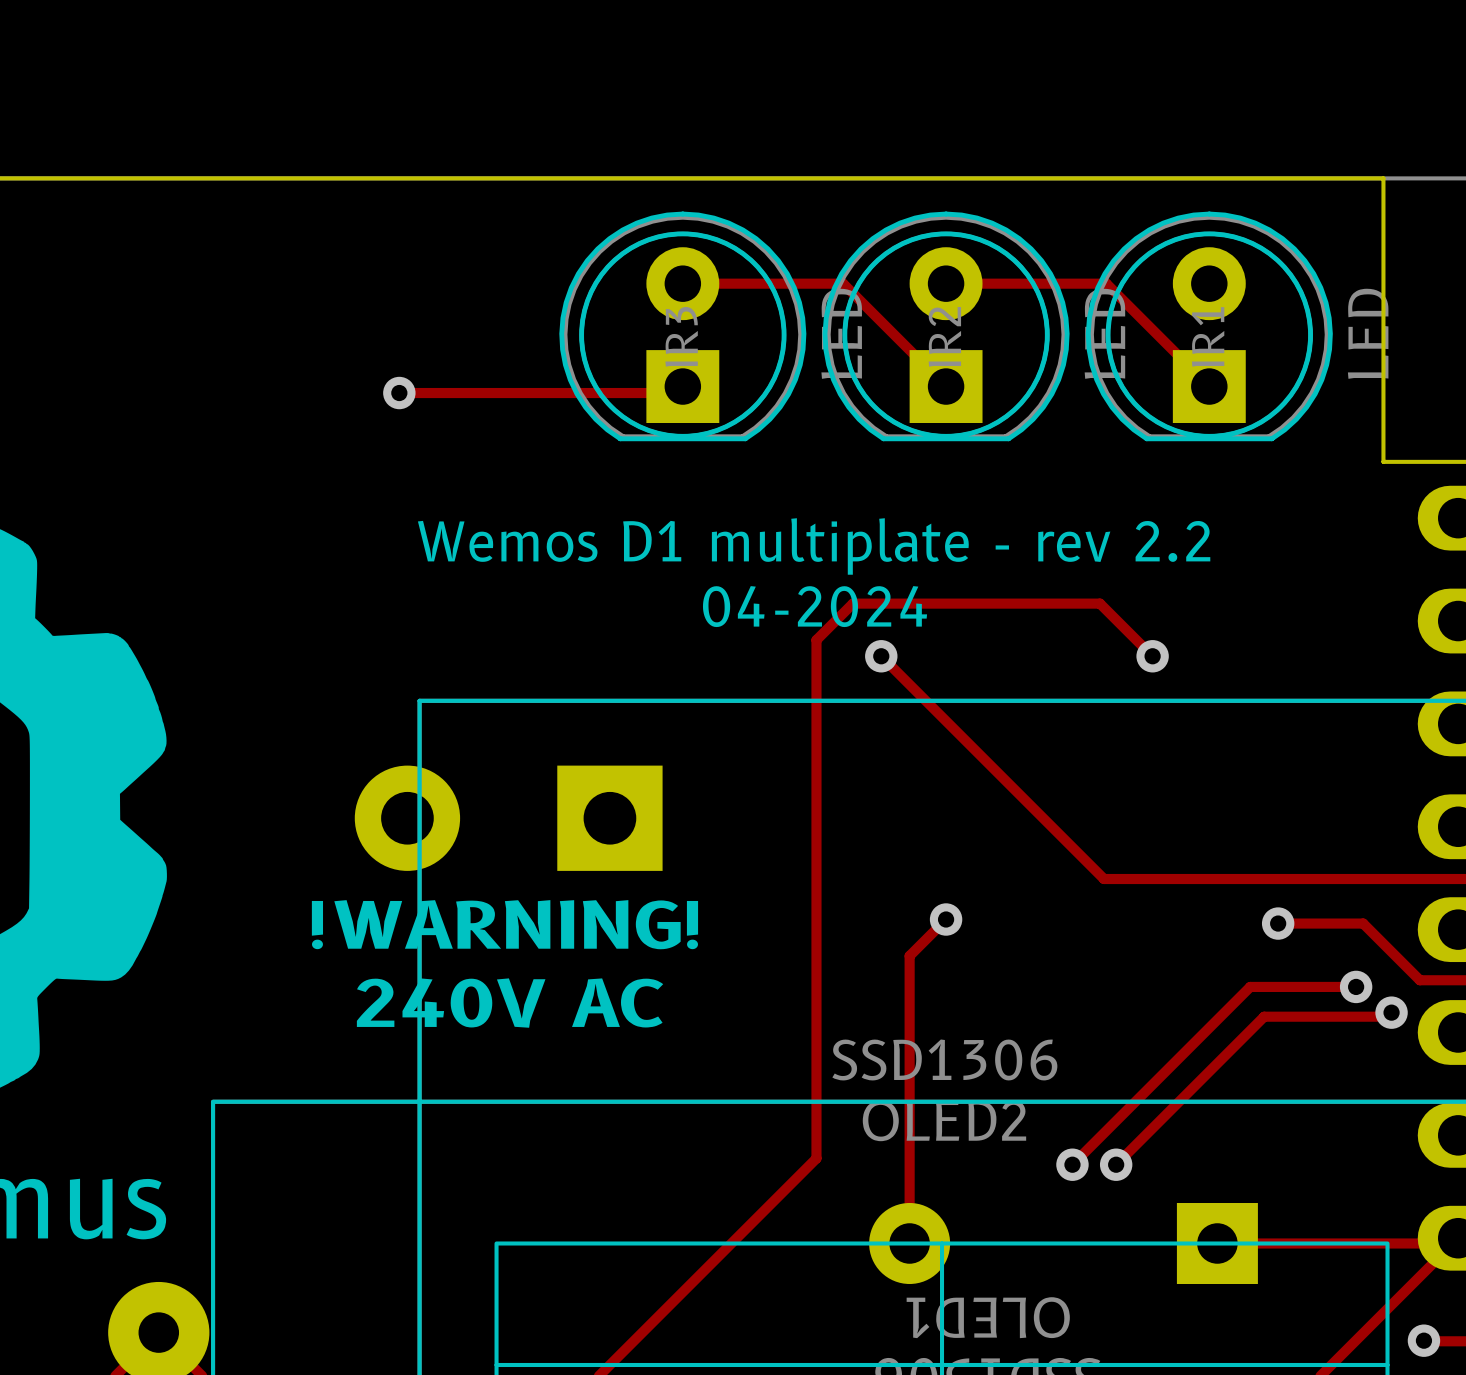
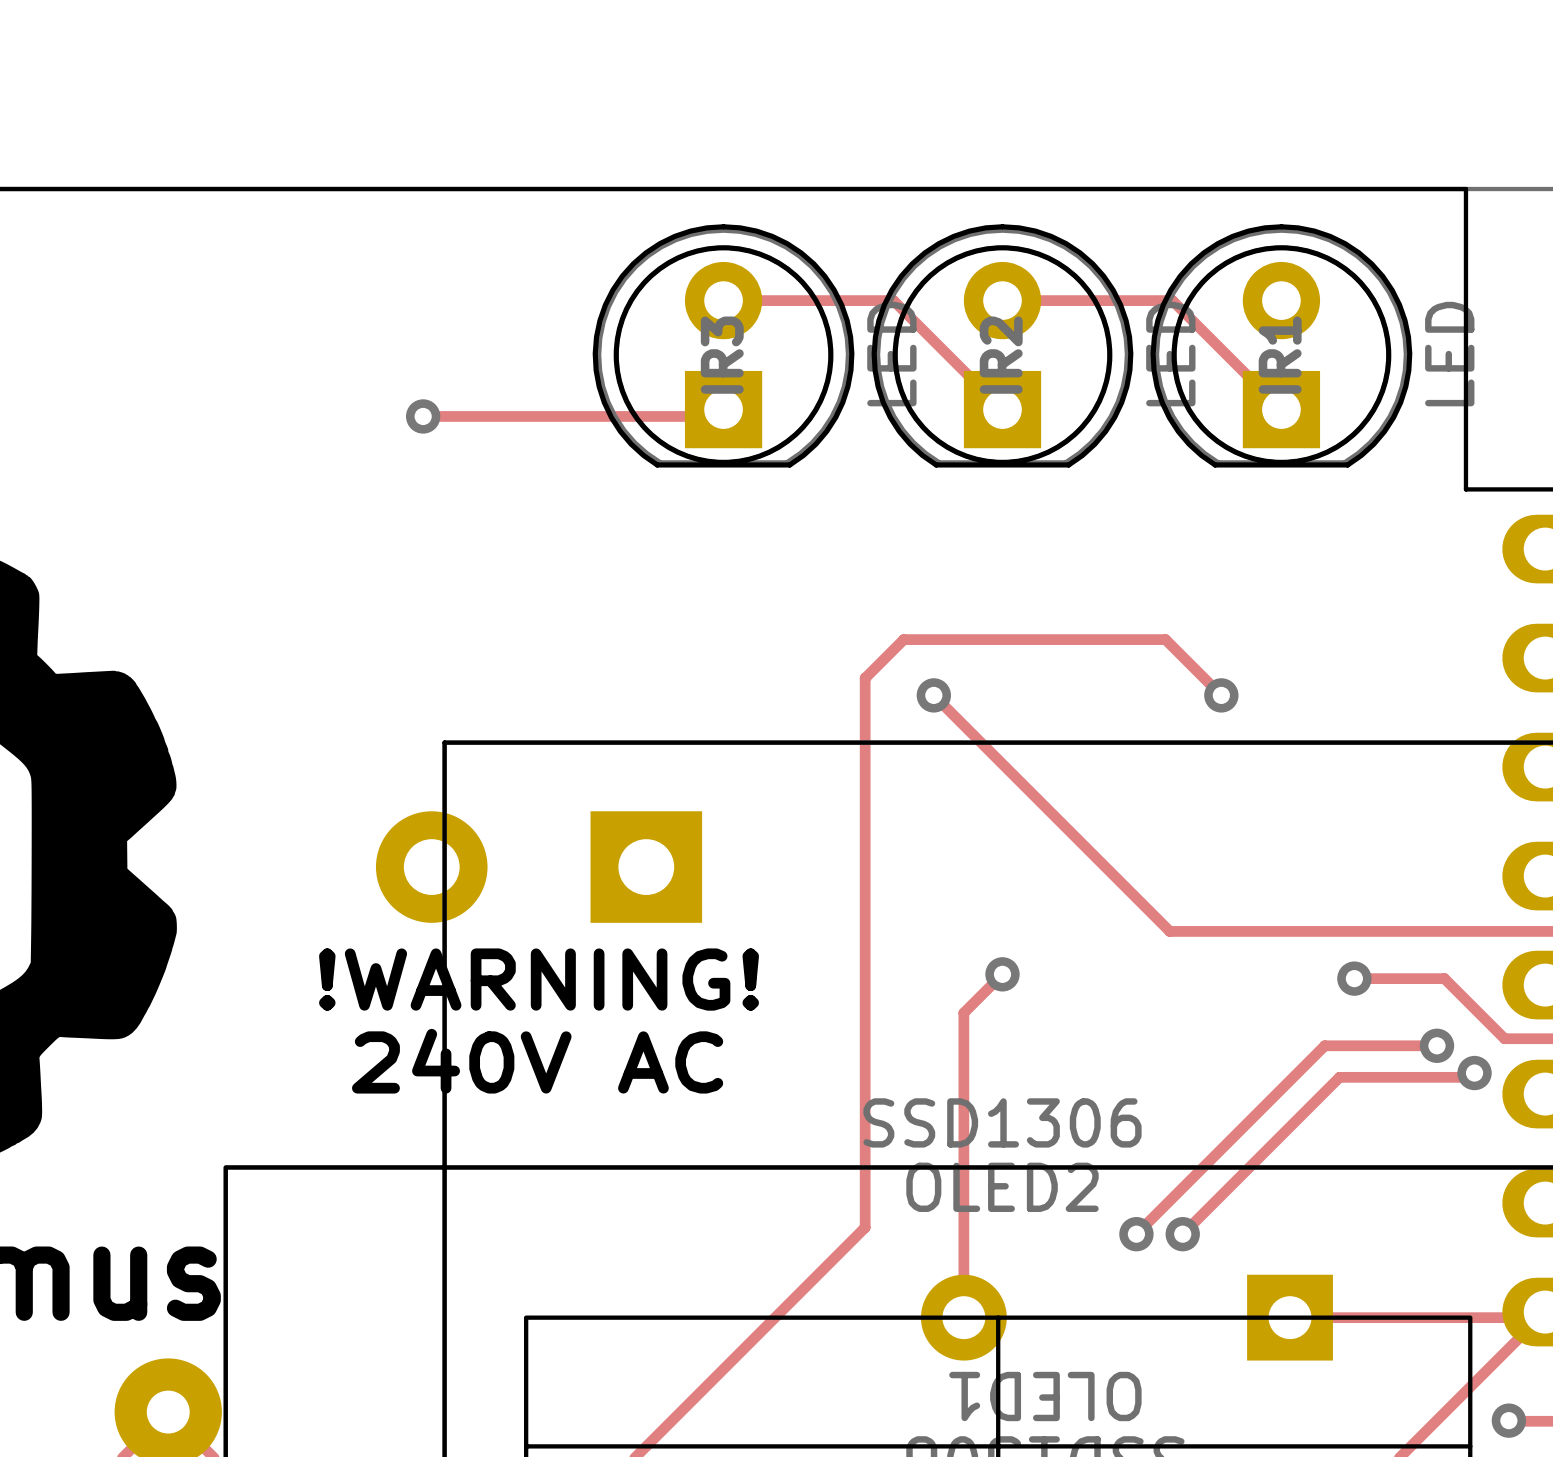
text: Wemos D1 multiplate - rev 2.2 (814, 546) -> none
text: 04-2024 (815, 606) -> none

